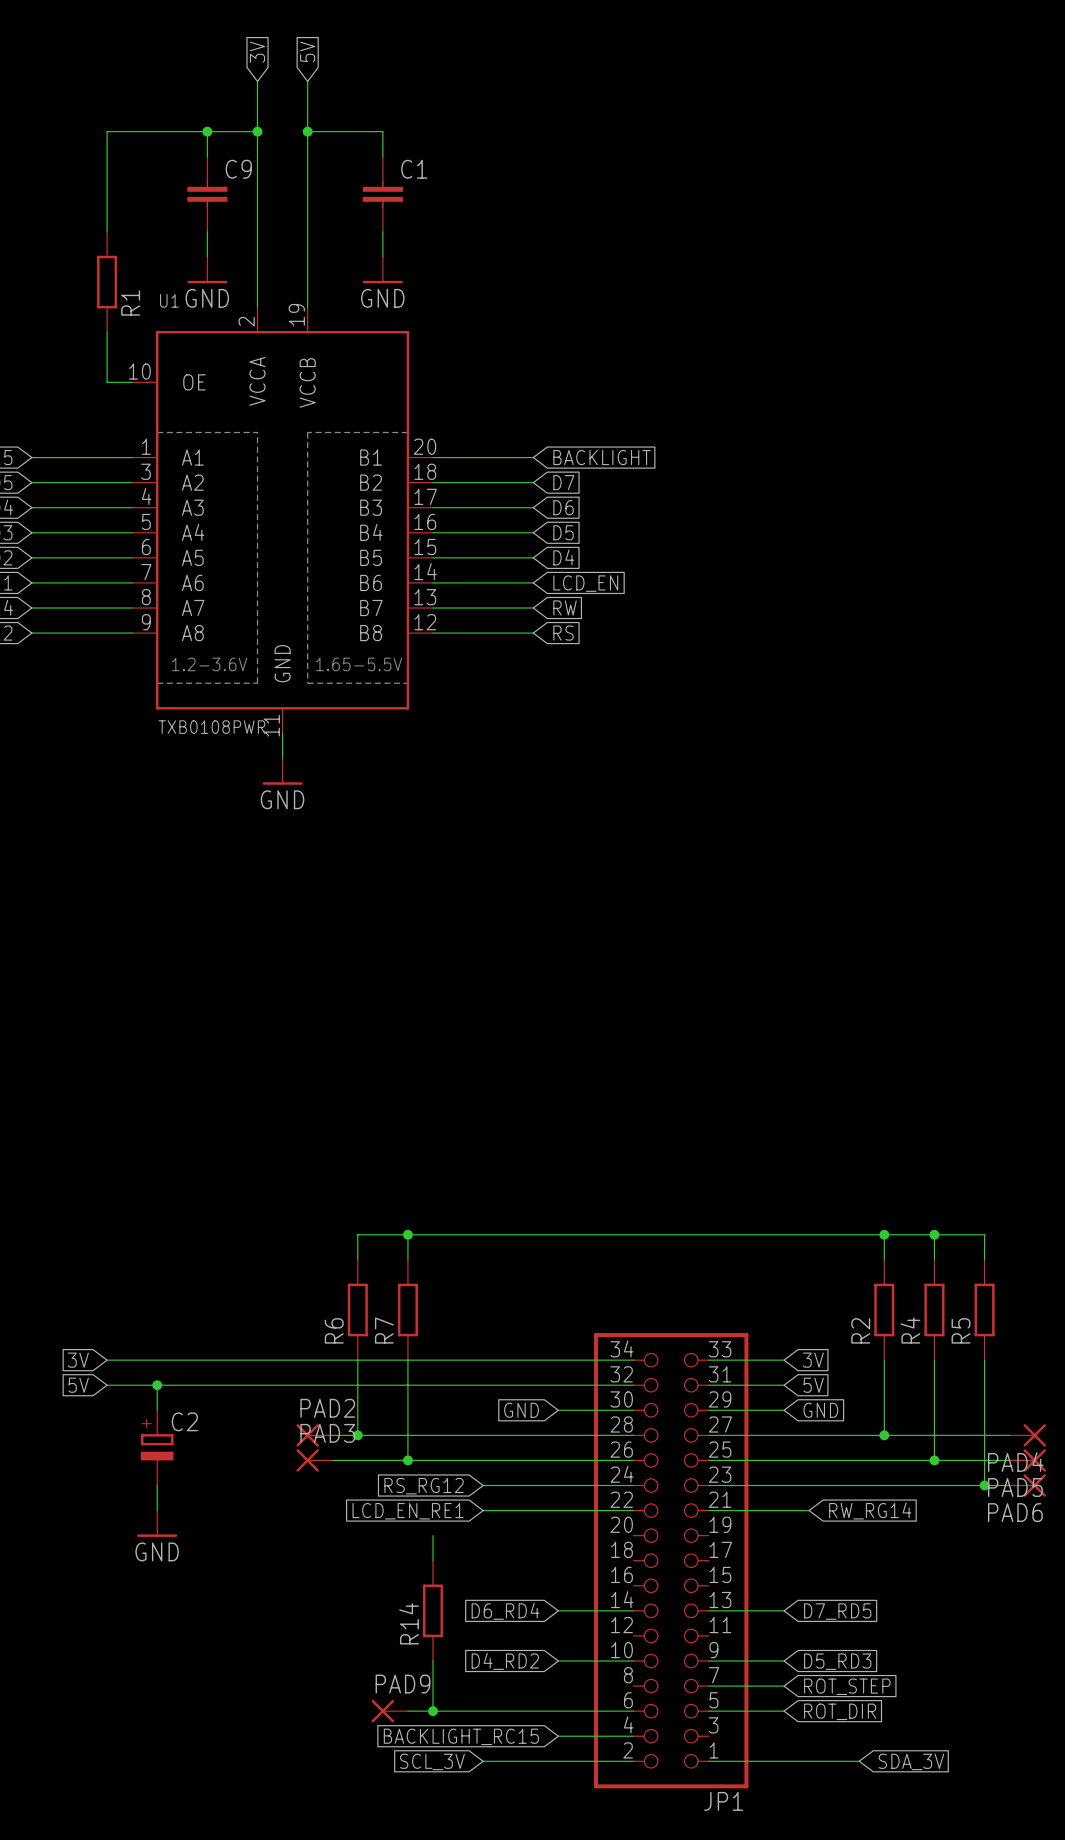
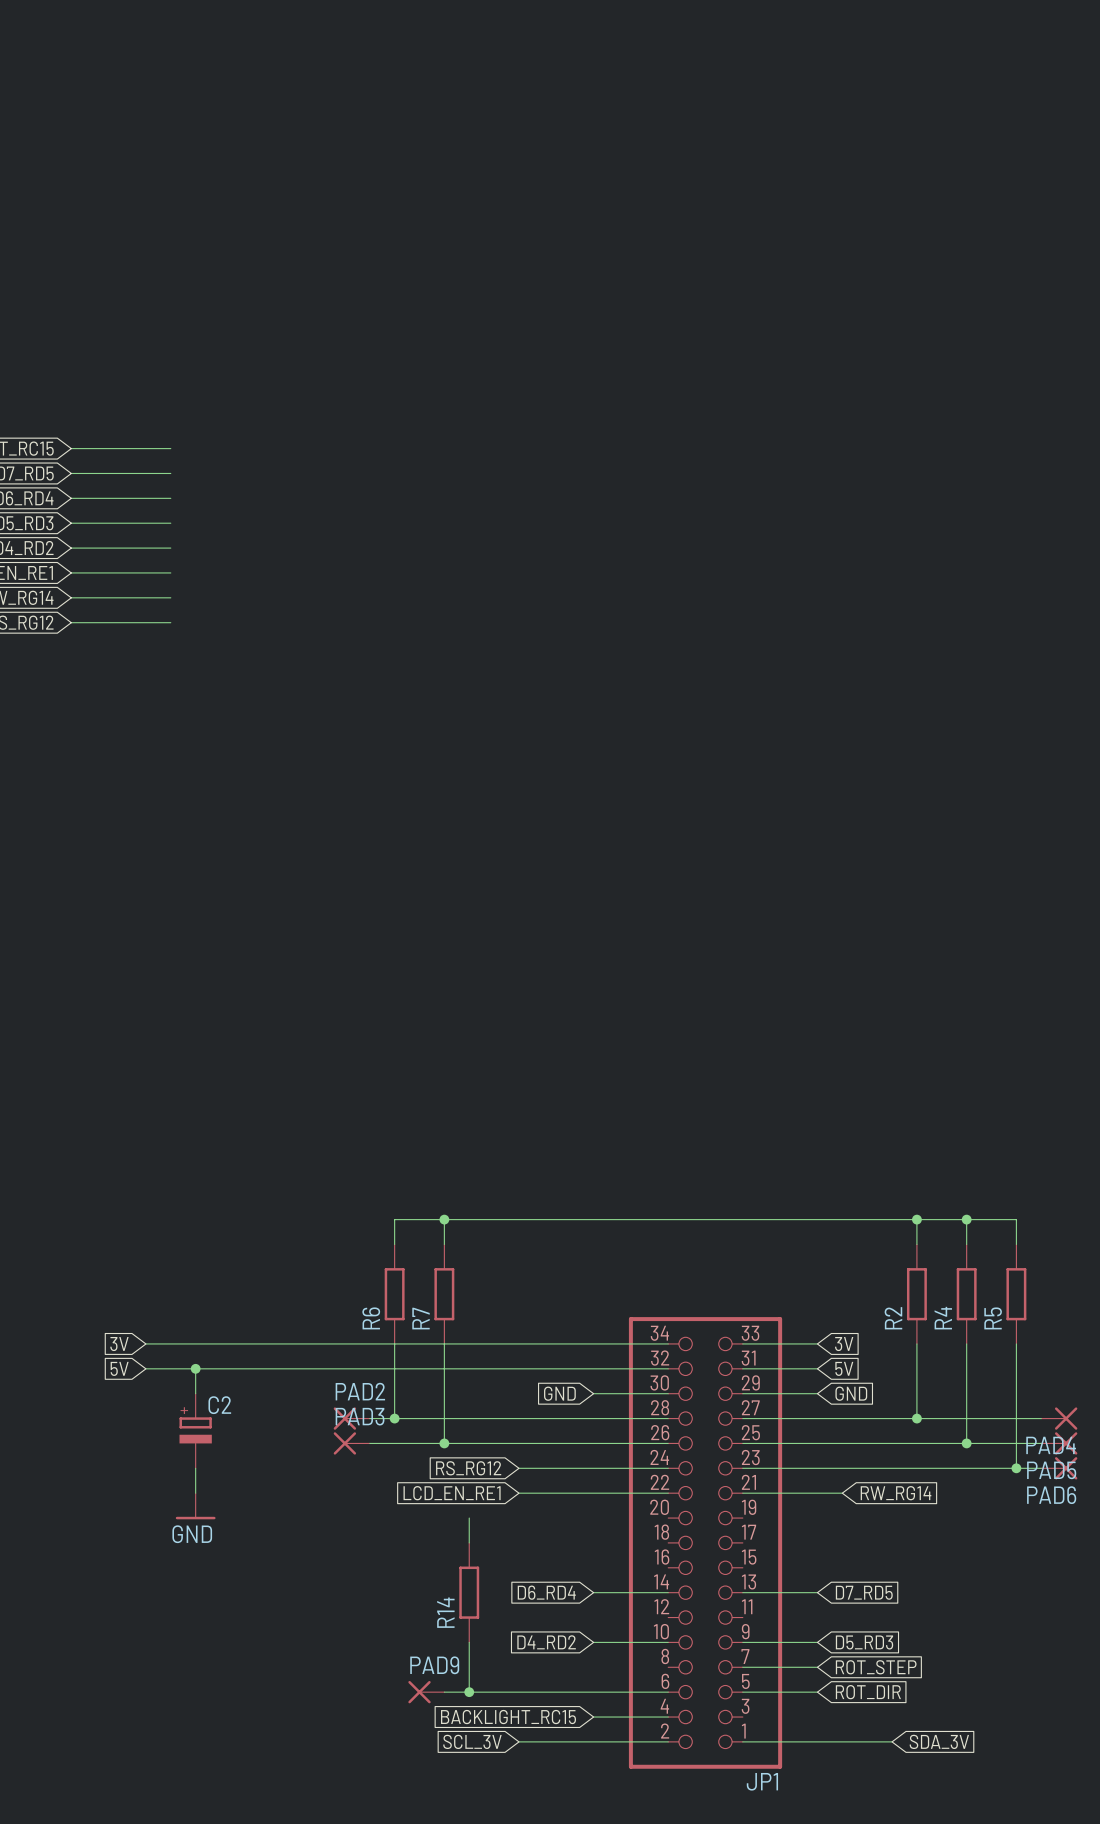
global label: 5V (307, 51) -> none
global label: 3V (257, 52) -> none
wire: (257, 81) (257, 307) -> none
wire: (307, 81) (307, 307) -> none
wire: (207, 131) (207, 156) -> none
junction: (207, 131) -> none
wire: (257, 131) (107, 131) (107, 231) -> none
junction: (257, 131) -> none
wire: (307, 131) (382, 131) (382, 156) -> none
junction: (307, 131) -> none
C9: (207, 194) -> none
C1: (382, 194) -> none
wire: (207, 231) (207, 257) -> none
wire: (382, 231) (382, 257) -> none
power symbol: GND (207, 270) -> none
power symbol: GND (382, 270) -> none
R1: (107, 282) -> none
wire: (107, 332) (107, 382) (132, 382) -> none
wire: (433, 457) (533, 457) -> none
global label: BACKLIGHT (602, 457) -> none
wire: (433, 482) (533, 482) -> none
global label: D7 (563, 482) -> none
wire: (433, 507) (533, 507) -> none
global label: D6 (563, 507) -> none
U1: TXB0108PWR (282, 520) -> none
wire: (433, 532) (533, 532) -> none
global label: D5 (563, 532) -> none
wire: (433, 557) (533, 557) -> none
global label: D4 (563, 557) -> none
wire: (433, 582) (533, 582) -> none
global label: LCD_EN (585, 583) -> none
wire: (433, 608) (533, 608) -> none
global label: RW (565, 608) -> none
wire: (433, 633) (533, 633) -> none
global label: RS (563, 633) -> none
wire: (282, 733) (282, 758) -> none
power symbol: GND (282, 771) -> none

